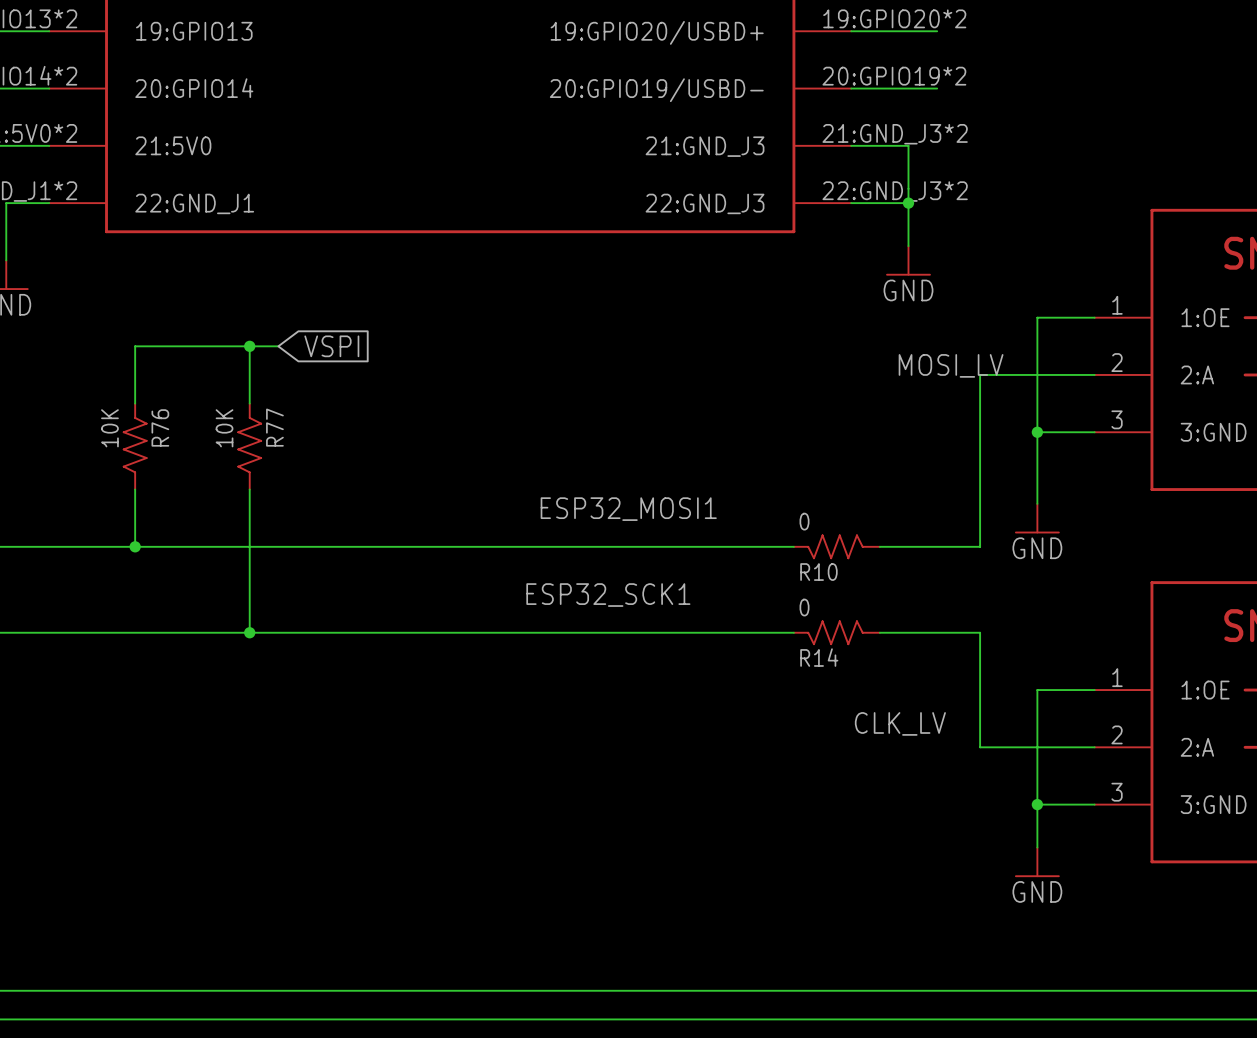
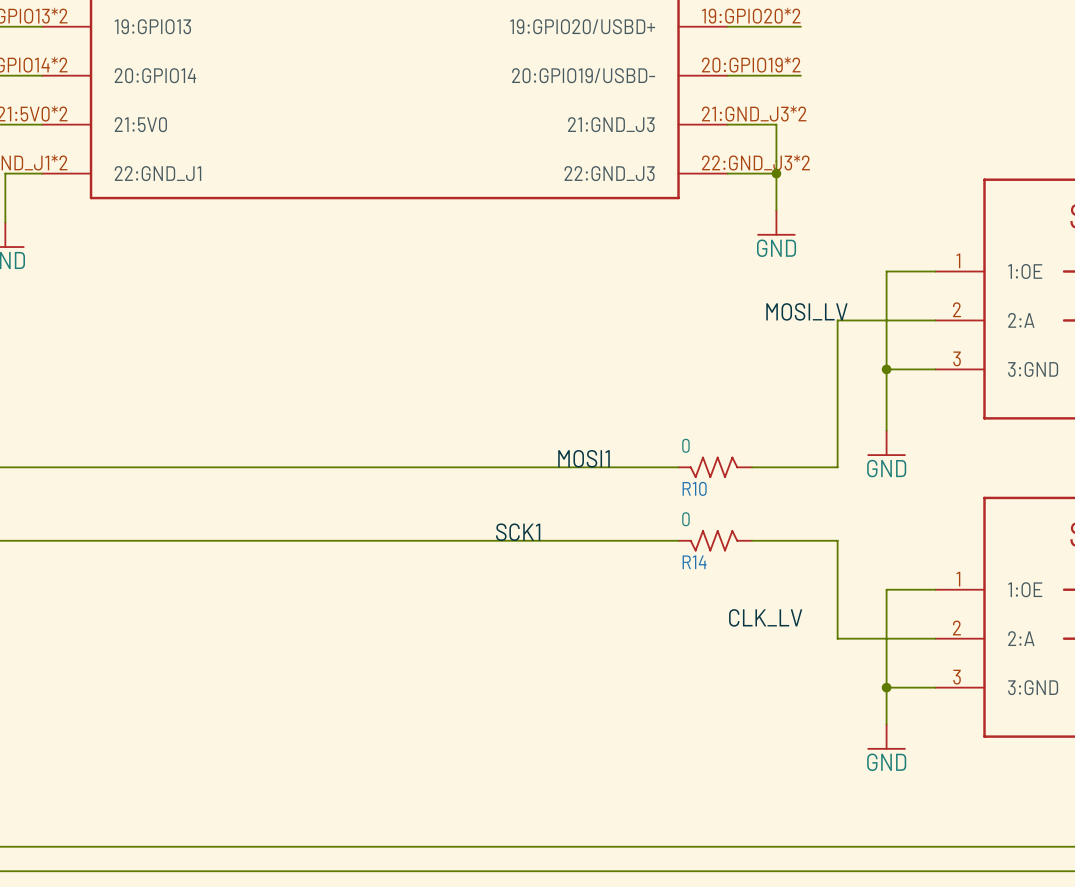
wire: (249, 346) (249, 403) -> none
junction: (249, 346) -> none
wire: (278, 346) (135, 346) (135, 403) -> none
global label: VSPI (331, 346) -> none
R76: 10K (135, 446) -> none
R77: 10K (249, 446) -> none
wire: (135, 489) (135, 546) -> none
wire: (249, 489) (249, 632) -> none
label: ESP32_MOSI1 (628, 509) -> MOSI1 (584, 458)
junction: (135, 546) -> none
label: ESP32_SCK1 (608, 595) -> none
label: none -> SCK1 (518, 532)
junction: (249, 632) -> none

